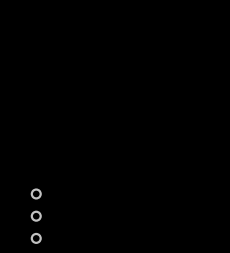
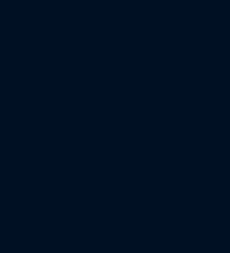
via: (36, 193) -> none
via: (36, 216) -> none
via: (36, 238) -> none

